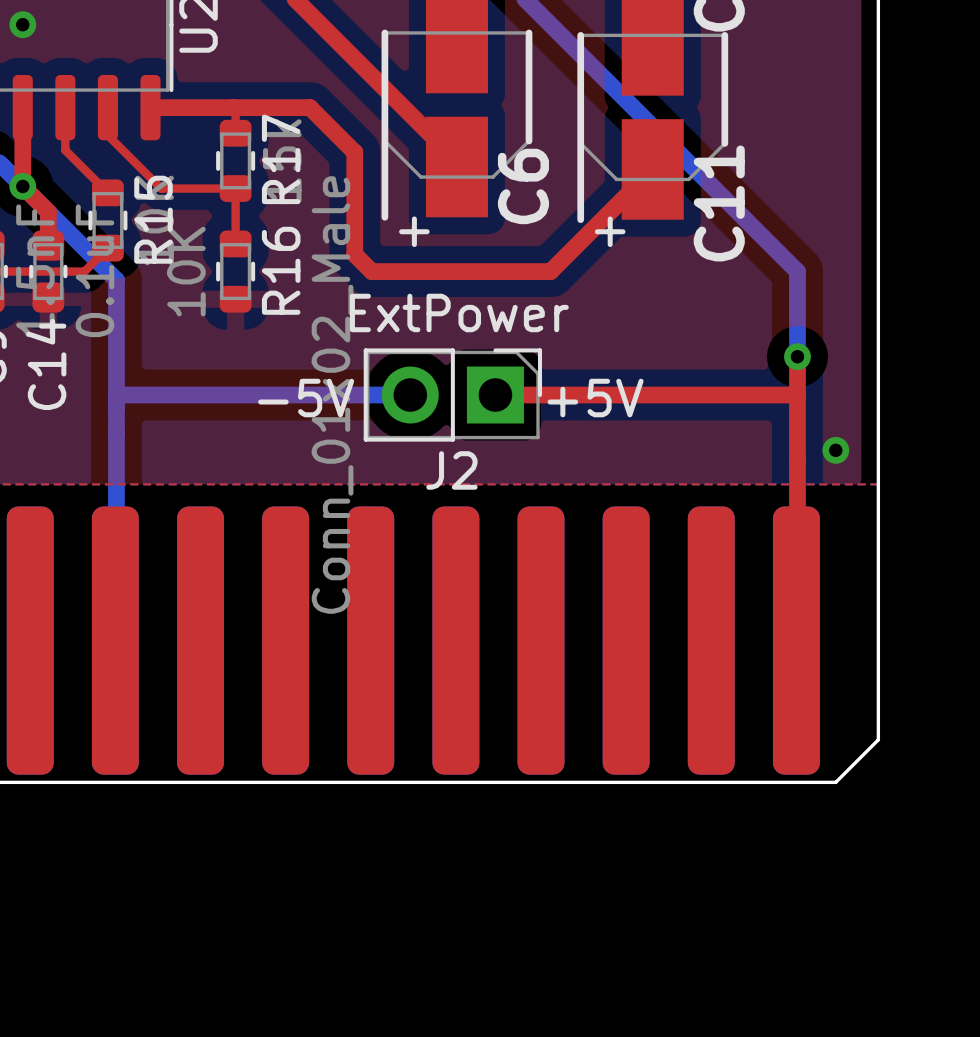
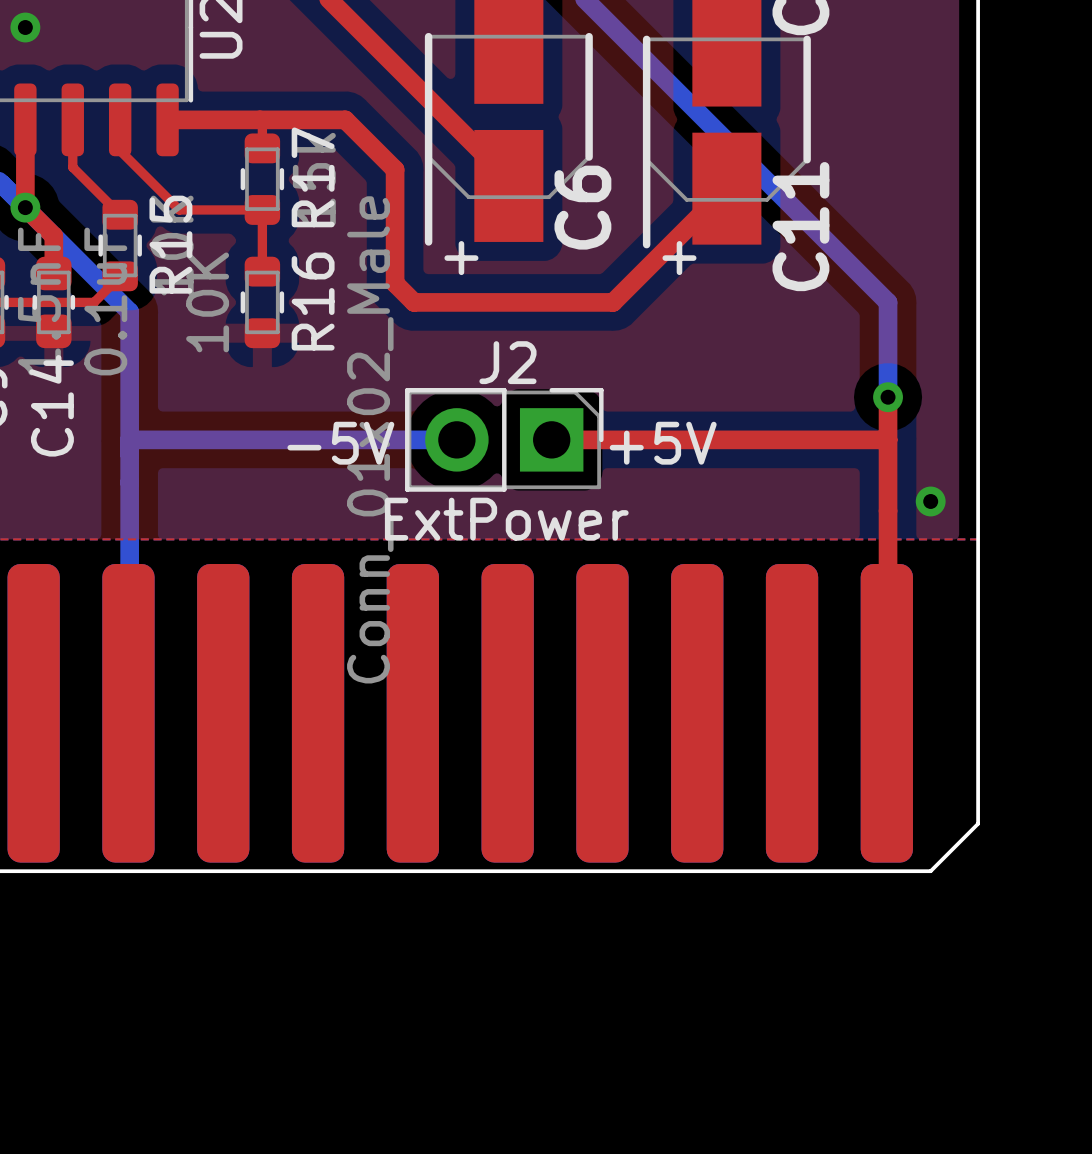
text position: ExtPower (459, 312) -> ExtPower (506, 519)
J2 name position: J2 (451, 470) -> J2 (507, 362)

